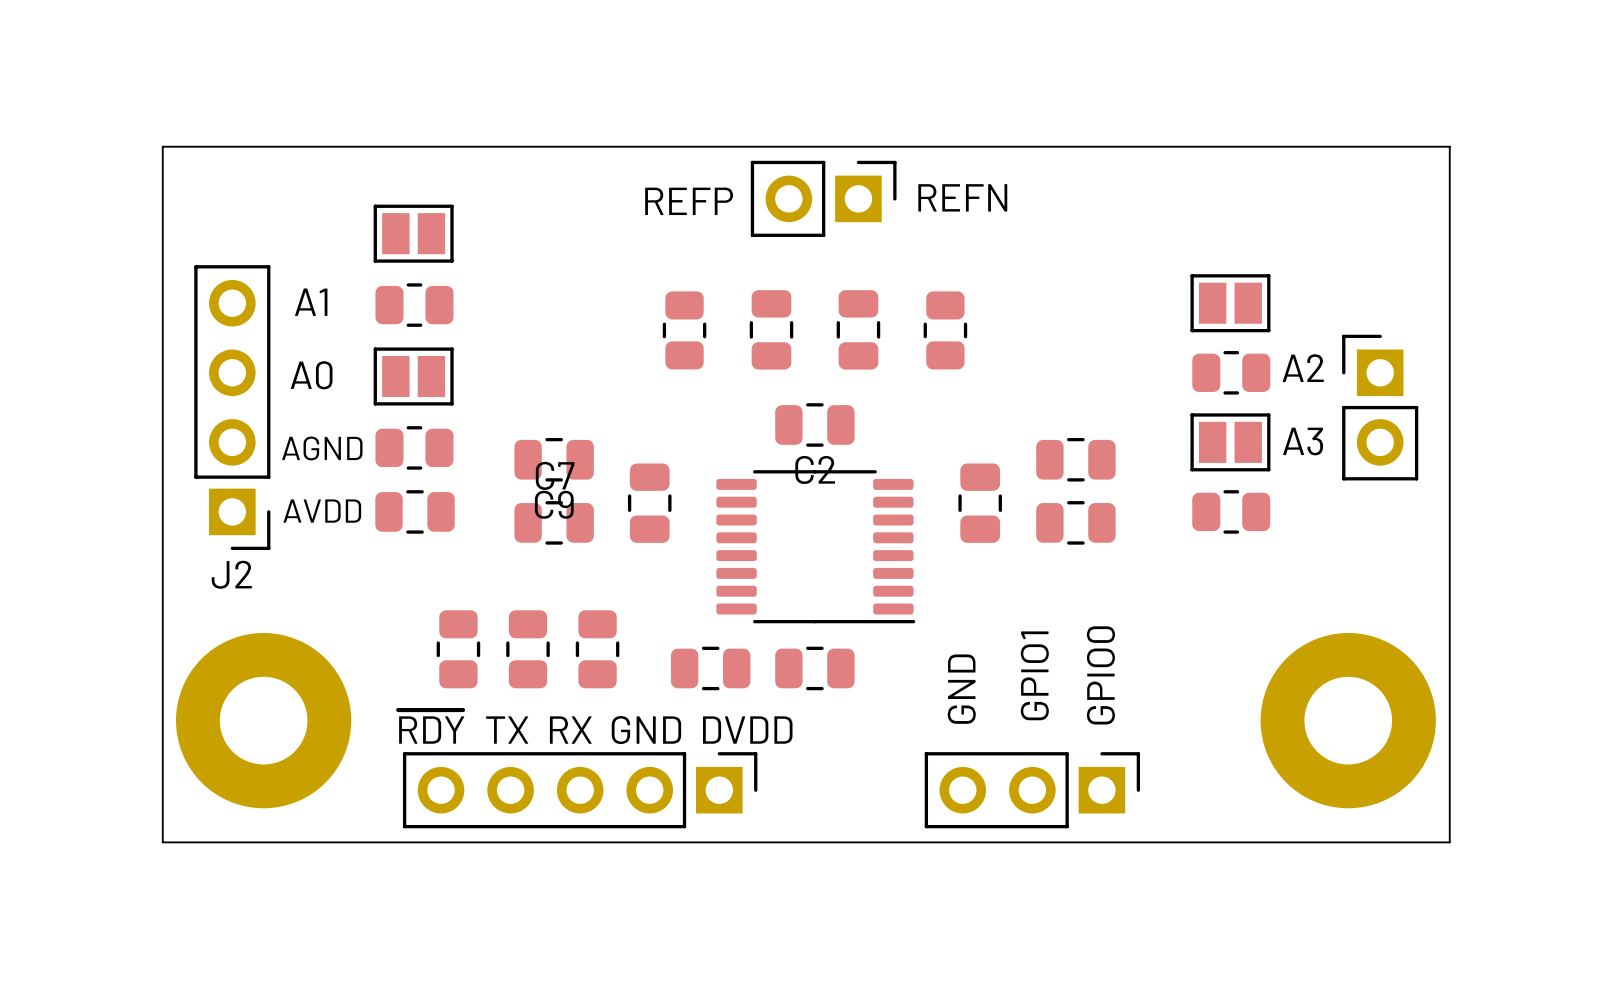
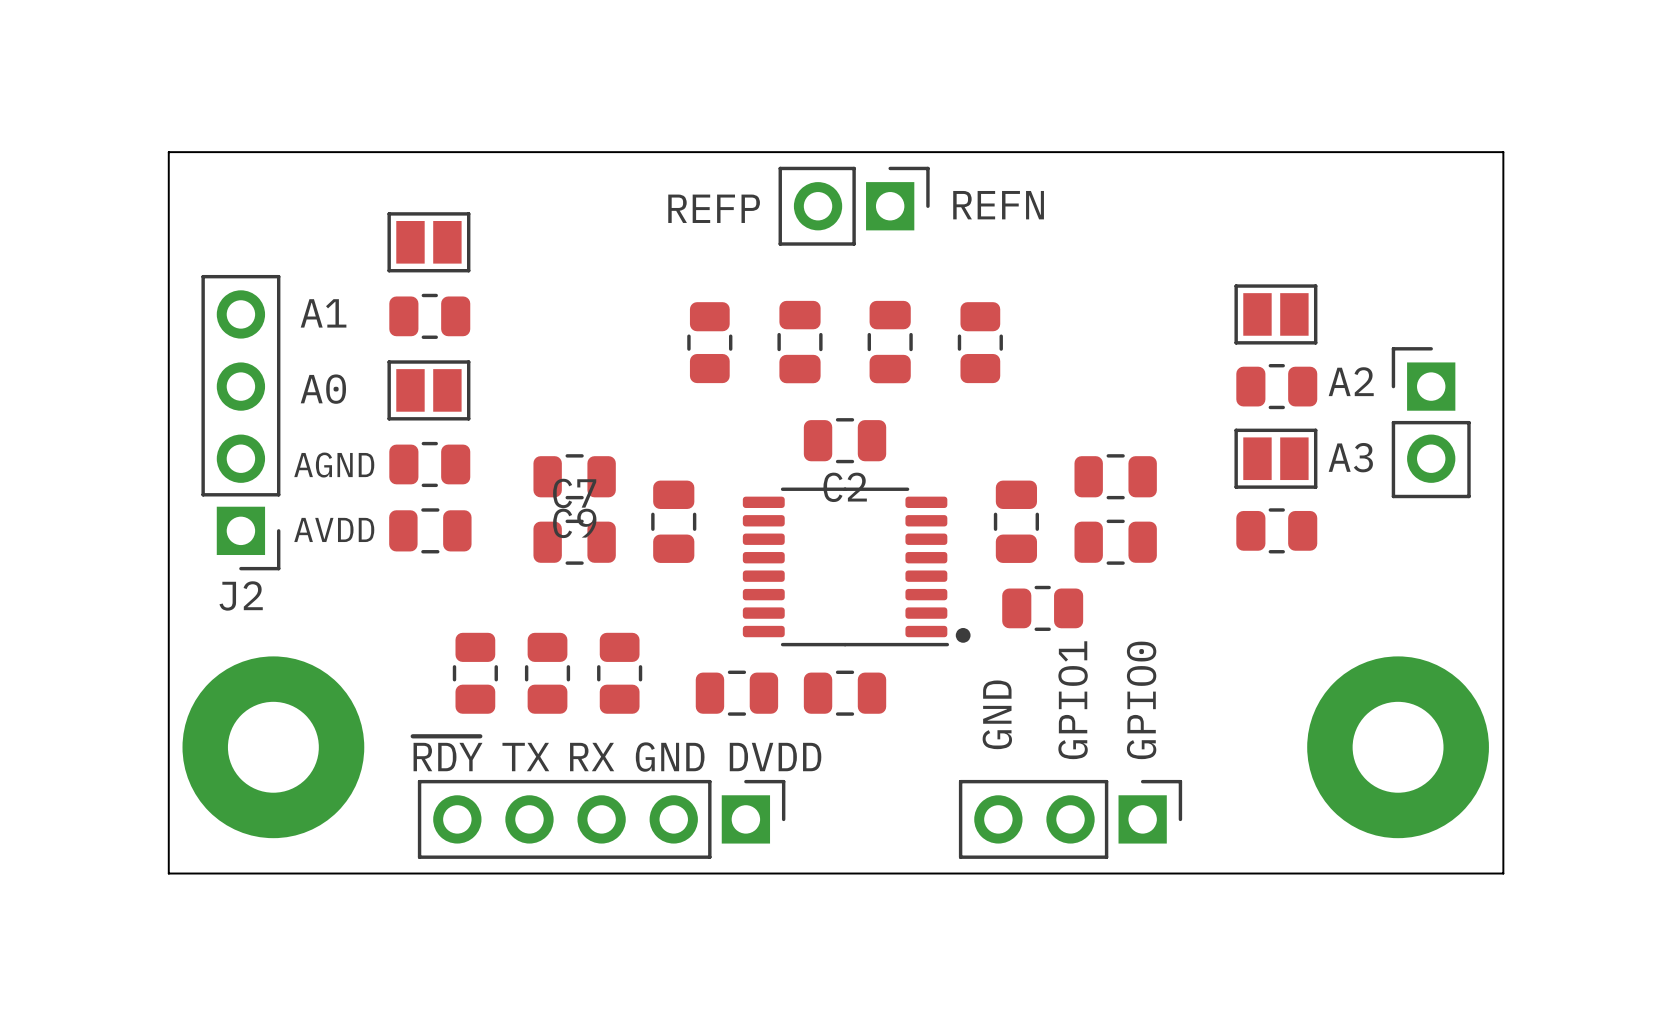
part: none -> (1042, 608)
drawing: none -> [955, 627, 971, 643]

